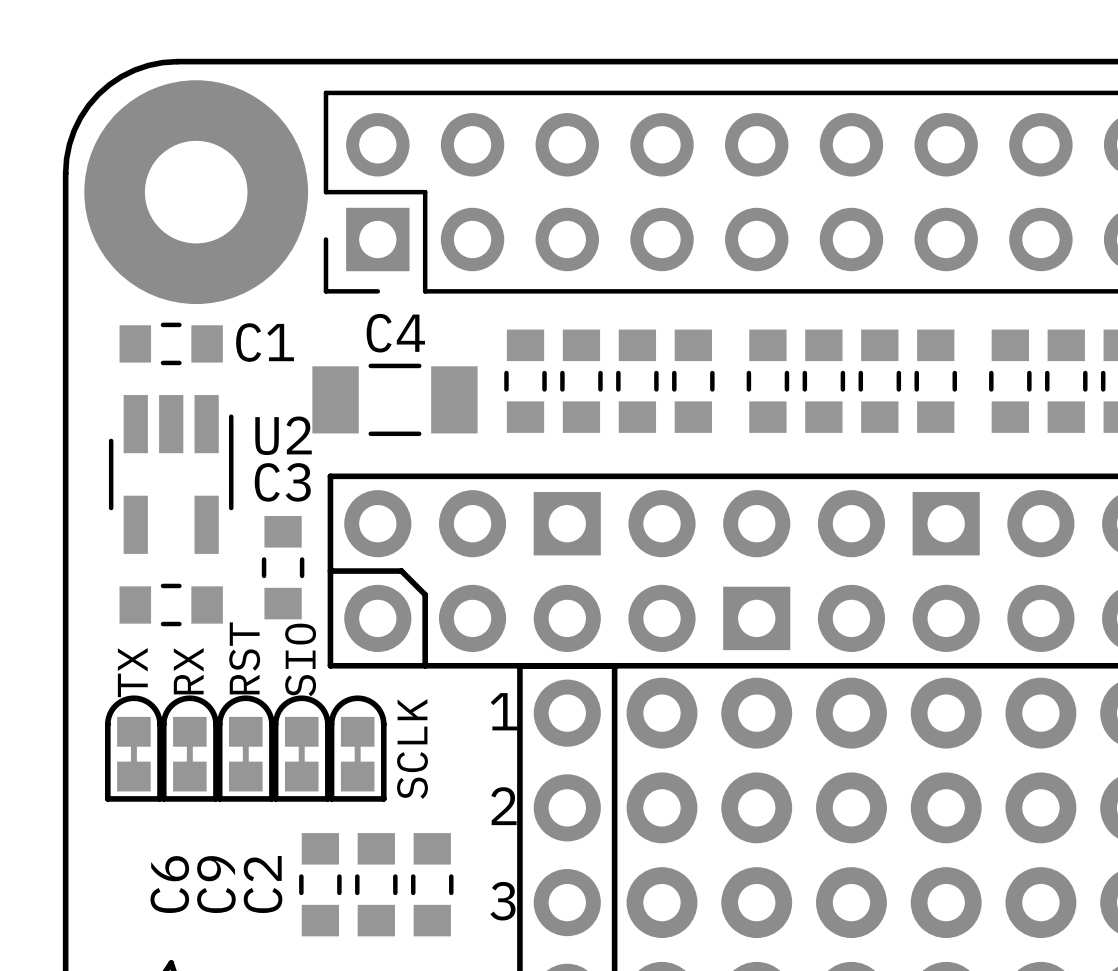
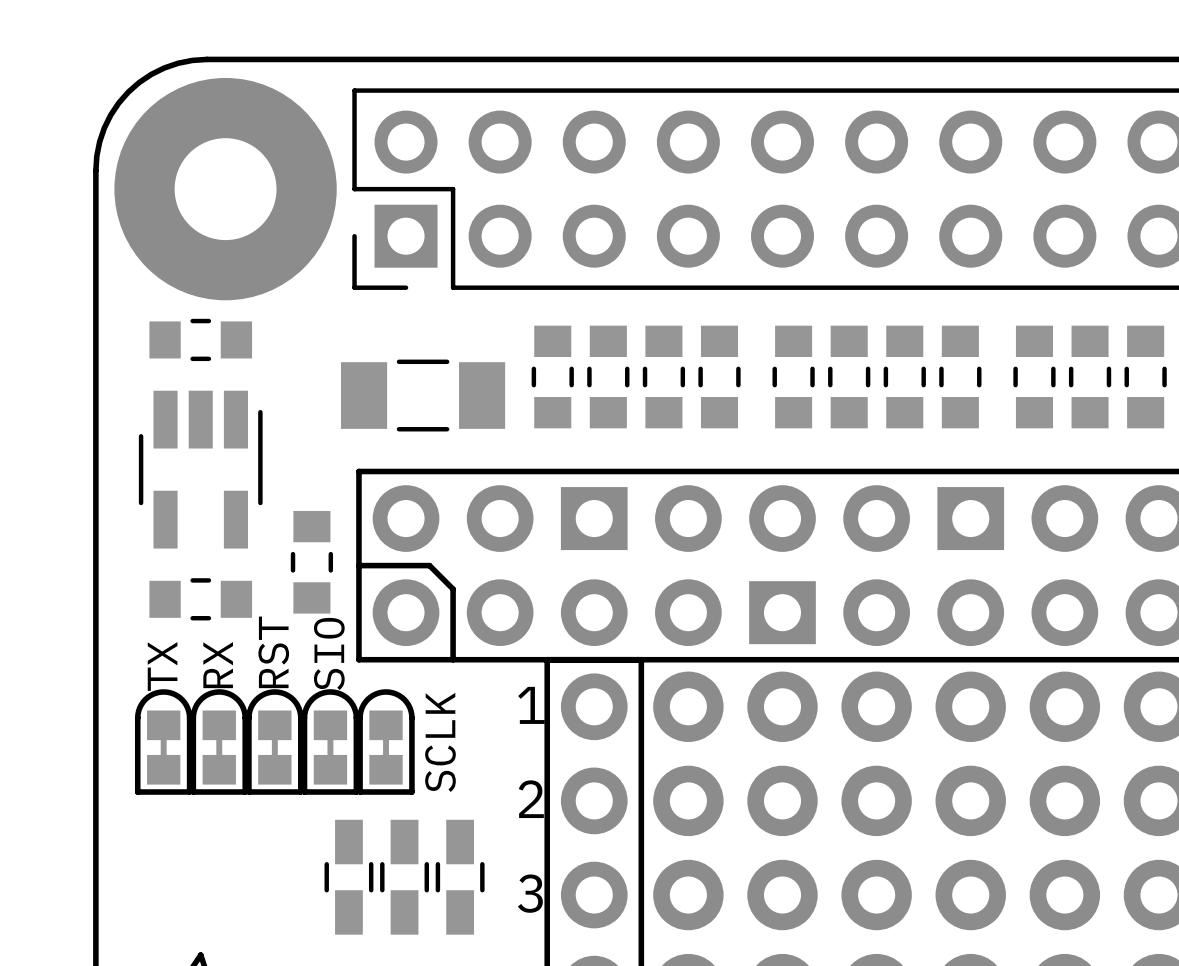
C4 name: C4 (395, 333) -> none
C1 name: C1 (265, 342) -> none
U2 name: U2 (283, 435) -> none
C3 name: C3 (282, 482) -> none
C6: (320, 884) -> none
part: none -> (348, 877)
C9: (376, 884) -> none
part: none -> (404, 877)
C2: (432, 884) -> none
part: none -> (460, 877)

